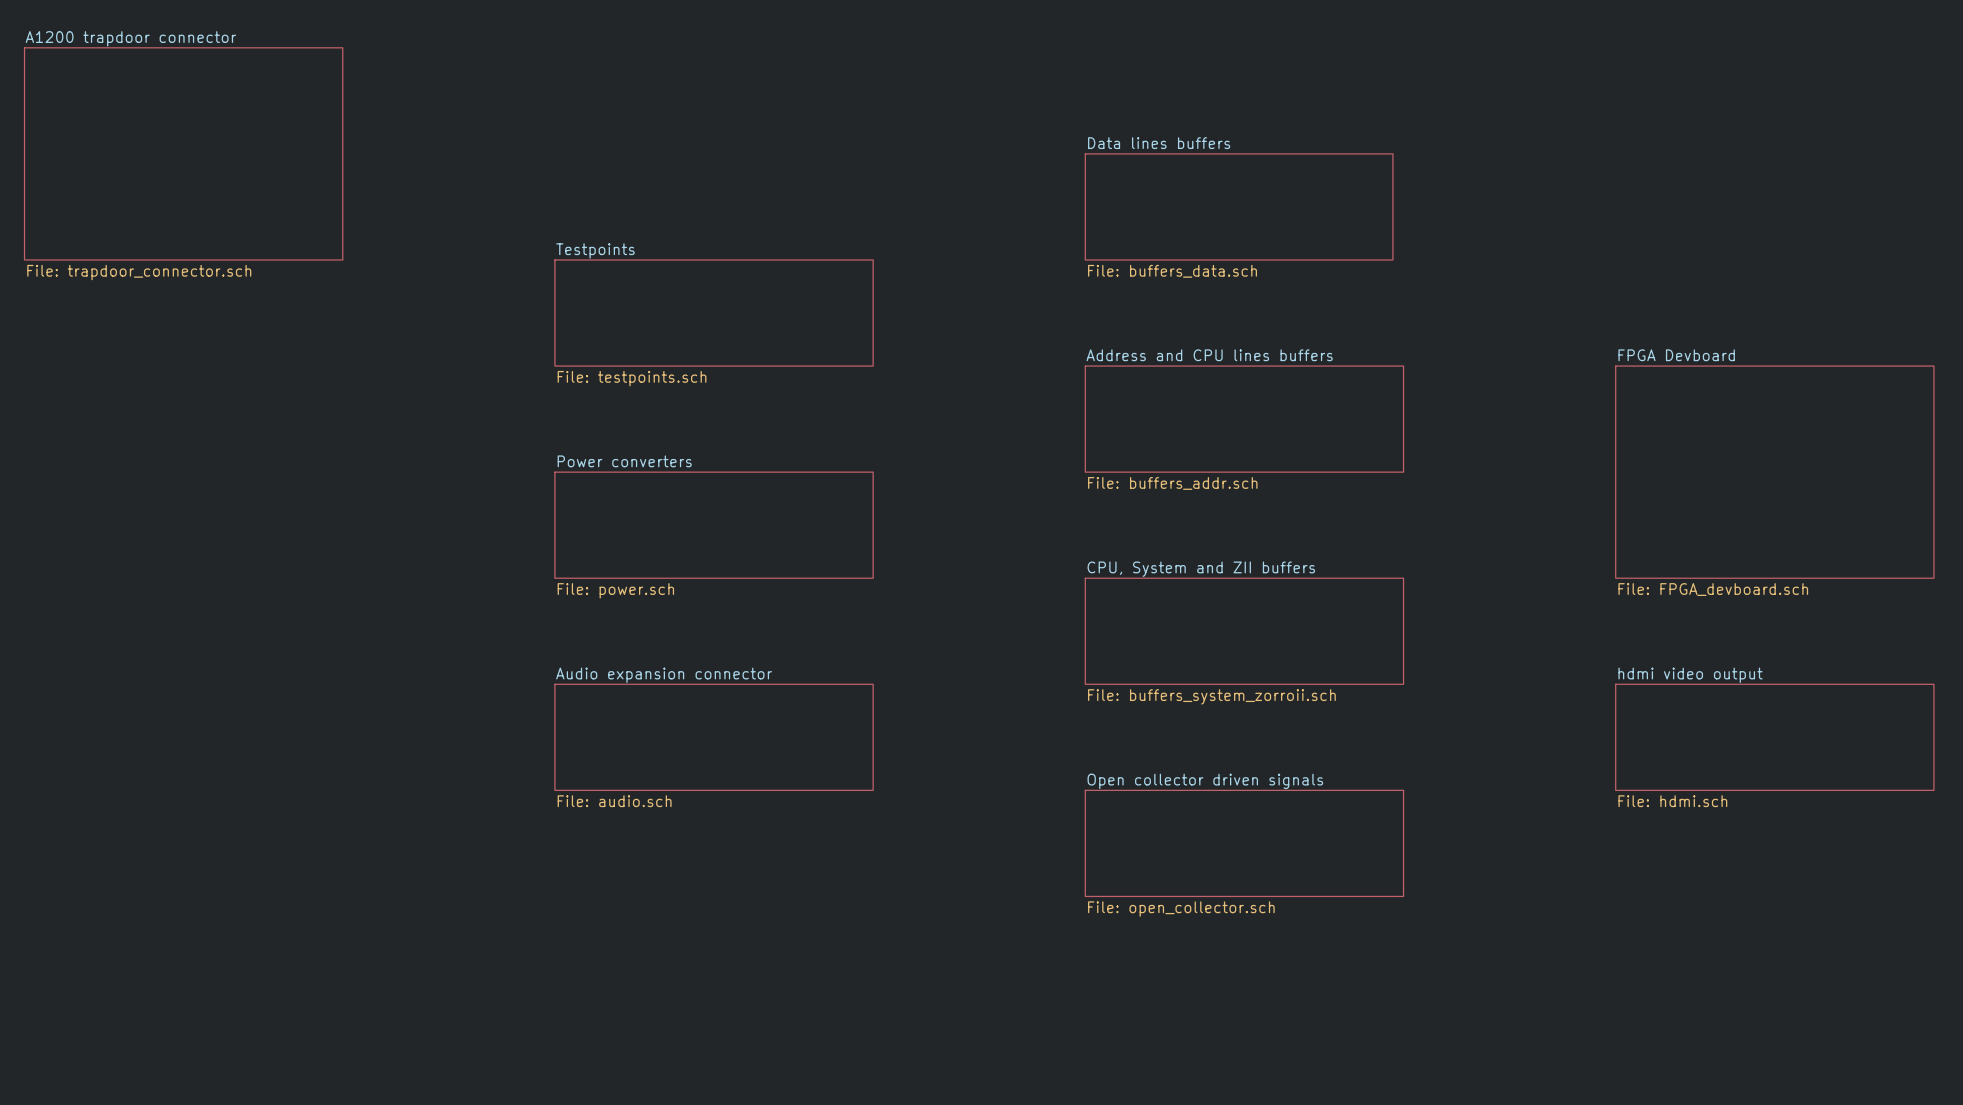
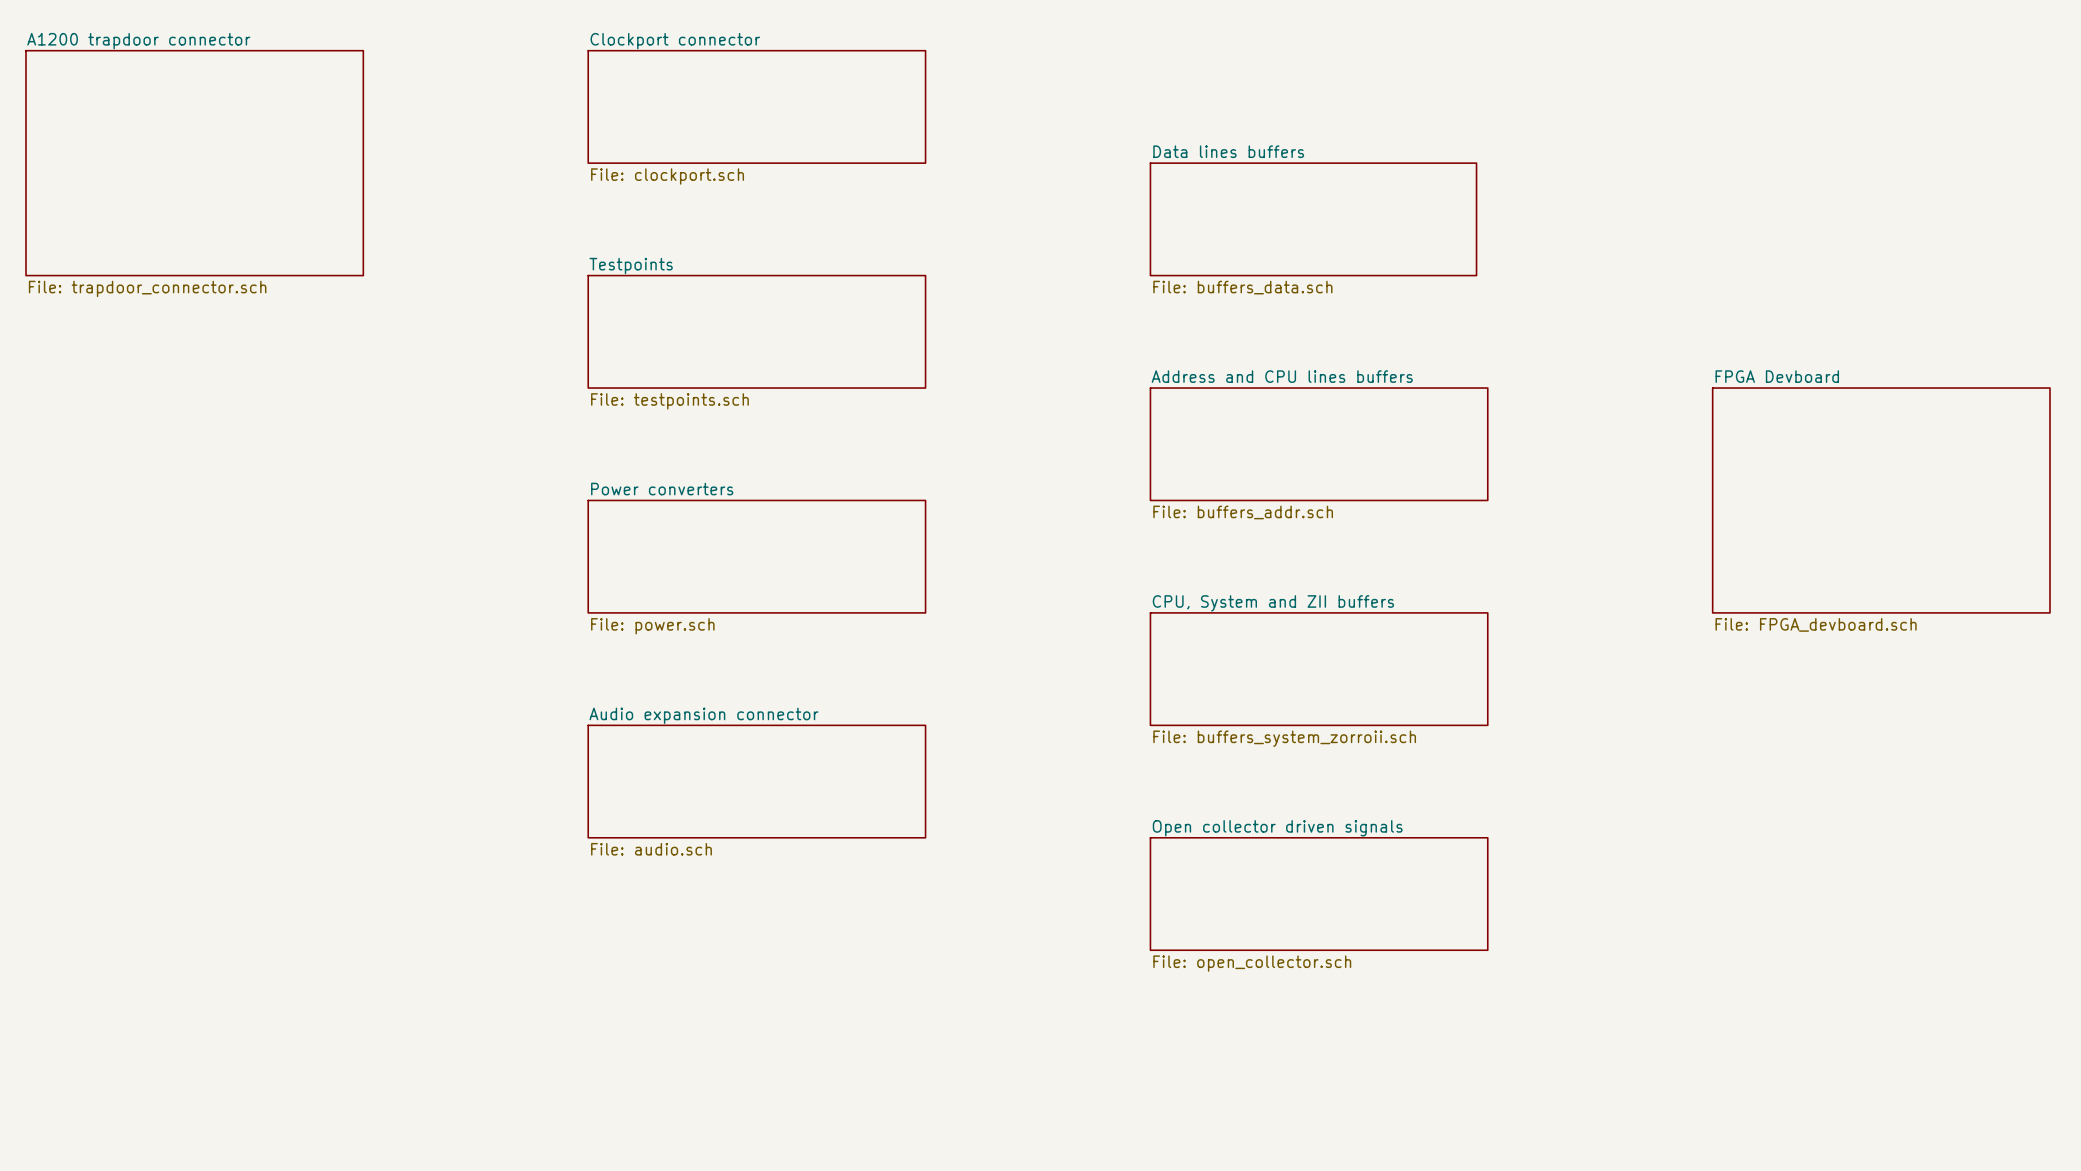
sheet Clockport connector: none -> File: clockport.sch (756, 106)
sheet hdmi video output: File: hdmi.sch (1774, 737) -> none

